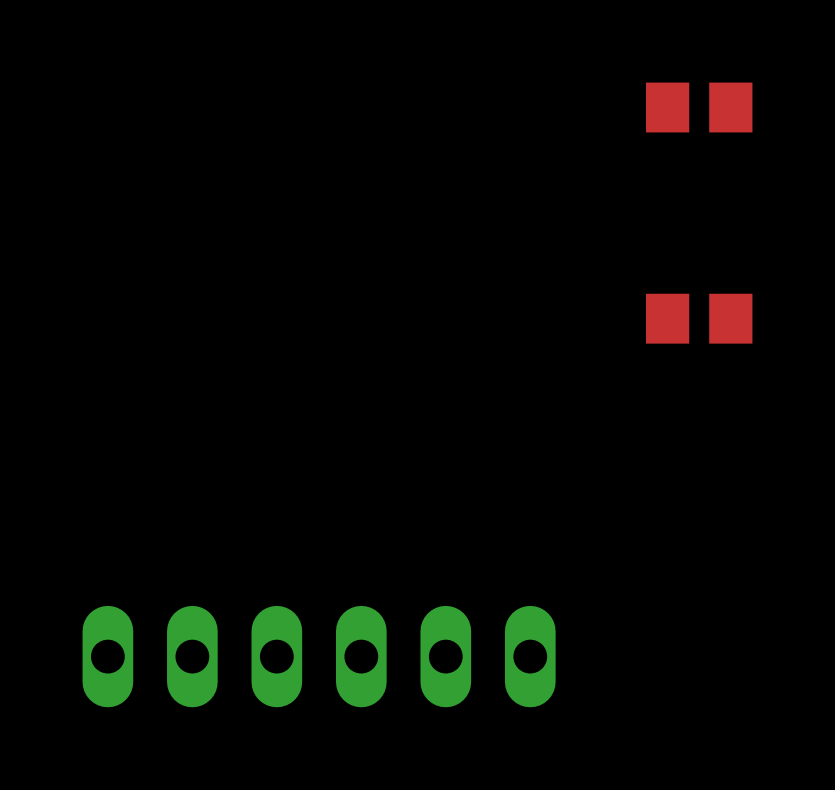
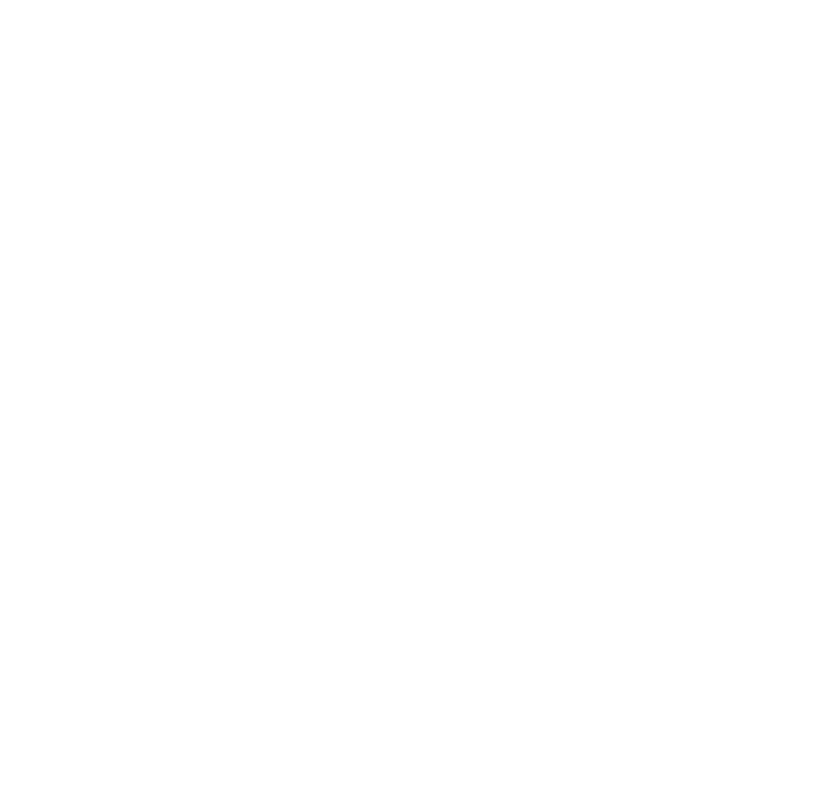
part: (699, 107) -> none
part: (699, 318) -> none
part: (319, 656) -> none

